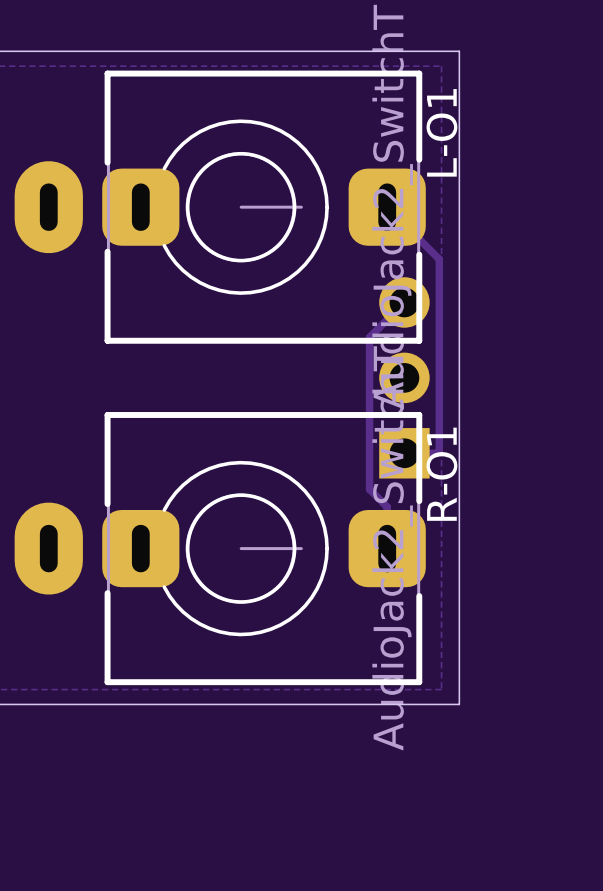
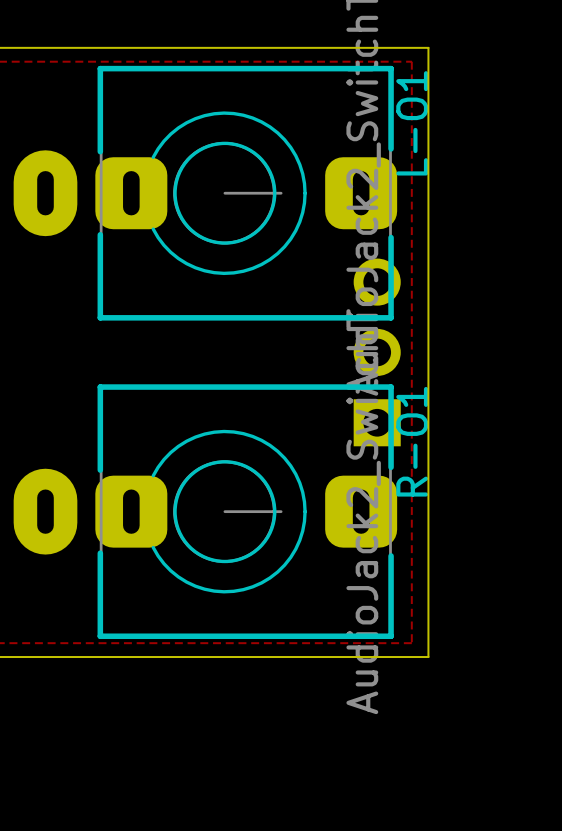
track: (387, 207) (439, 259) (439, 451) (437, 453) (404, 453) -> none
track: (404, 302) (369, 337) (369, 489) (387, 507) (387, 548) -> none

